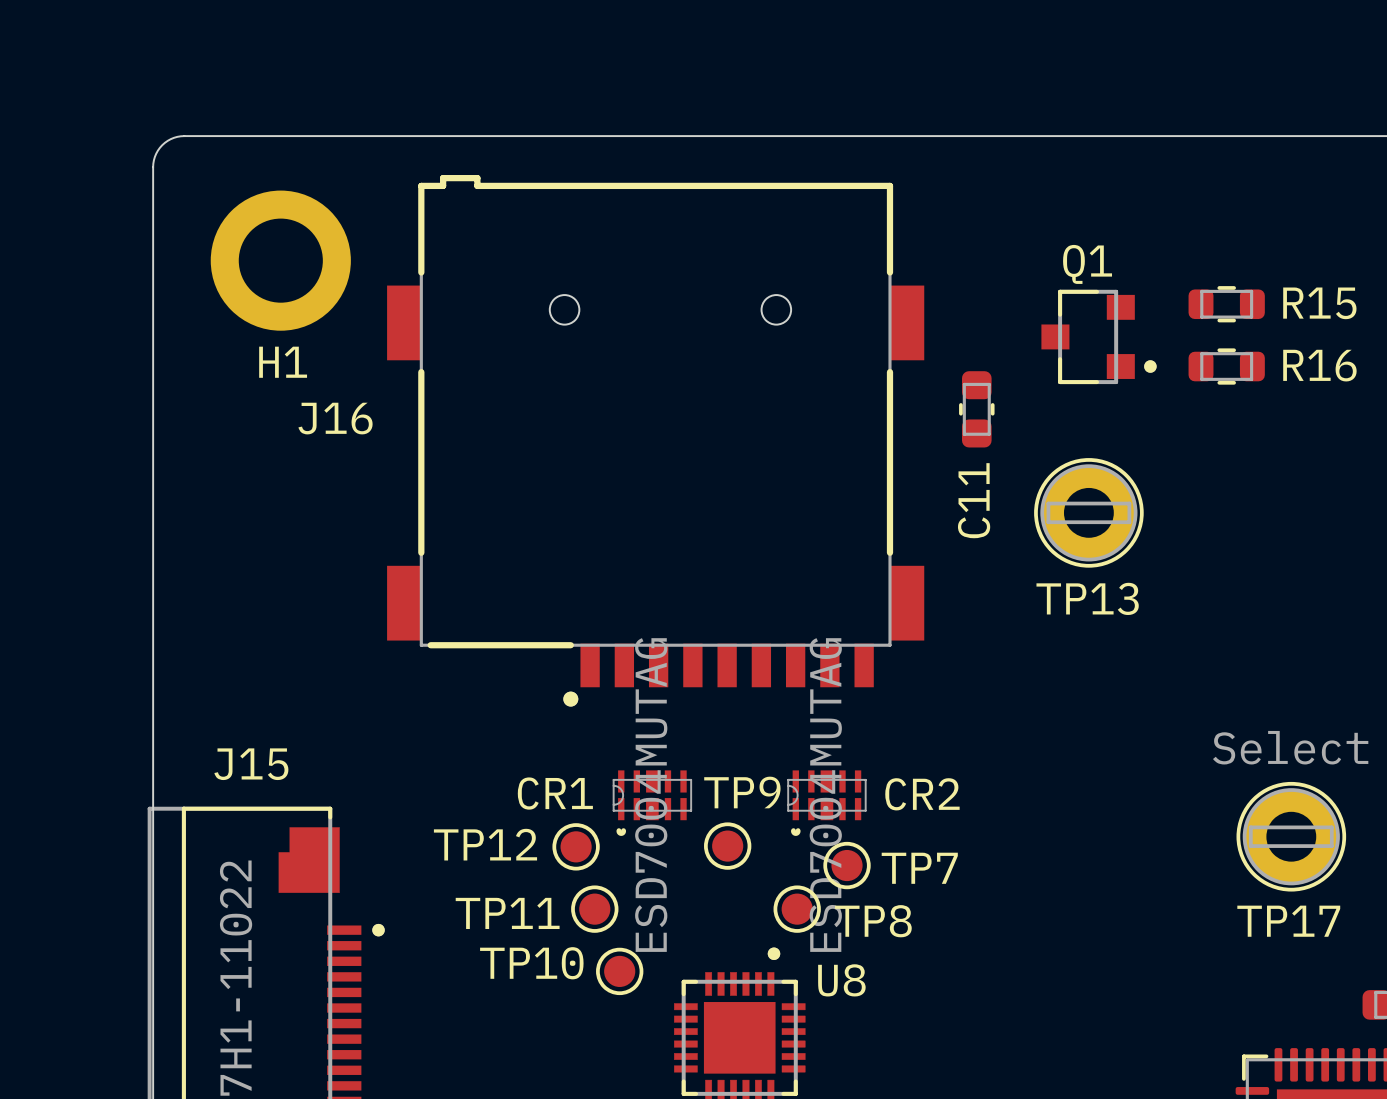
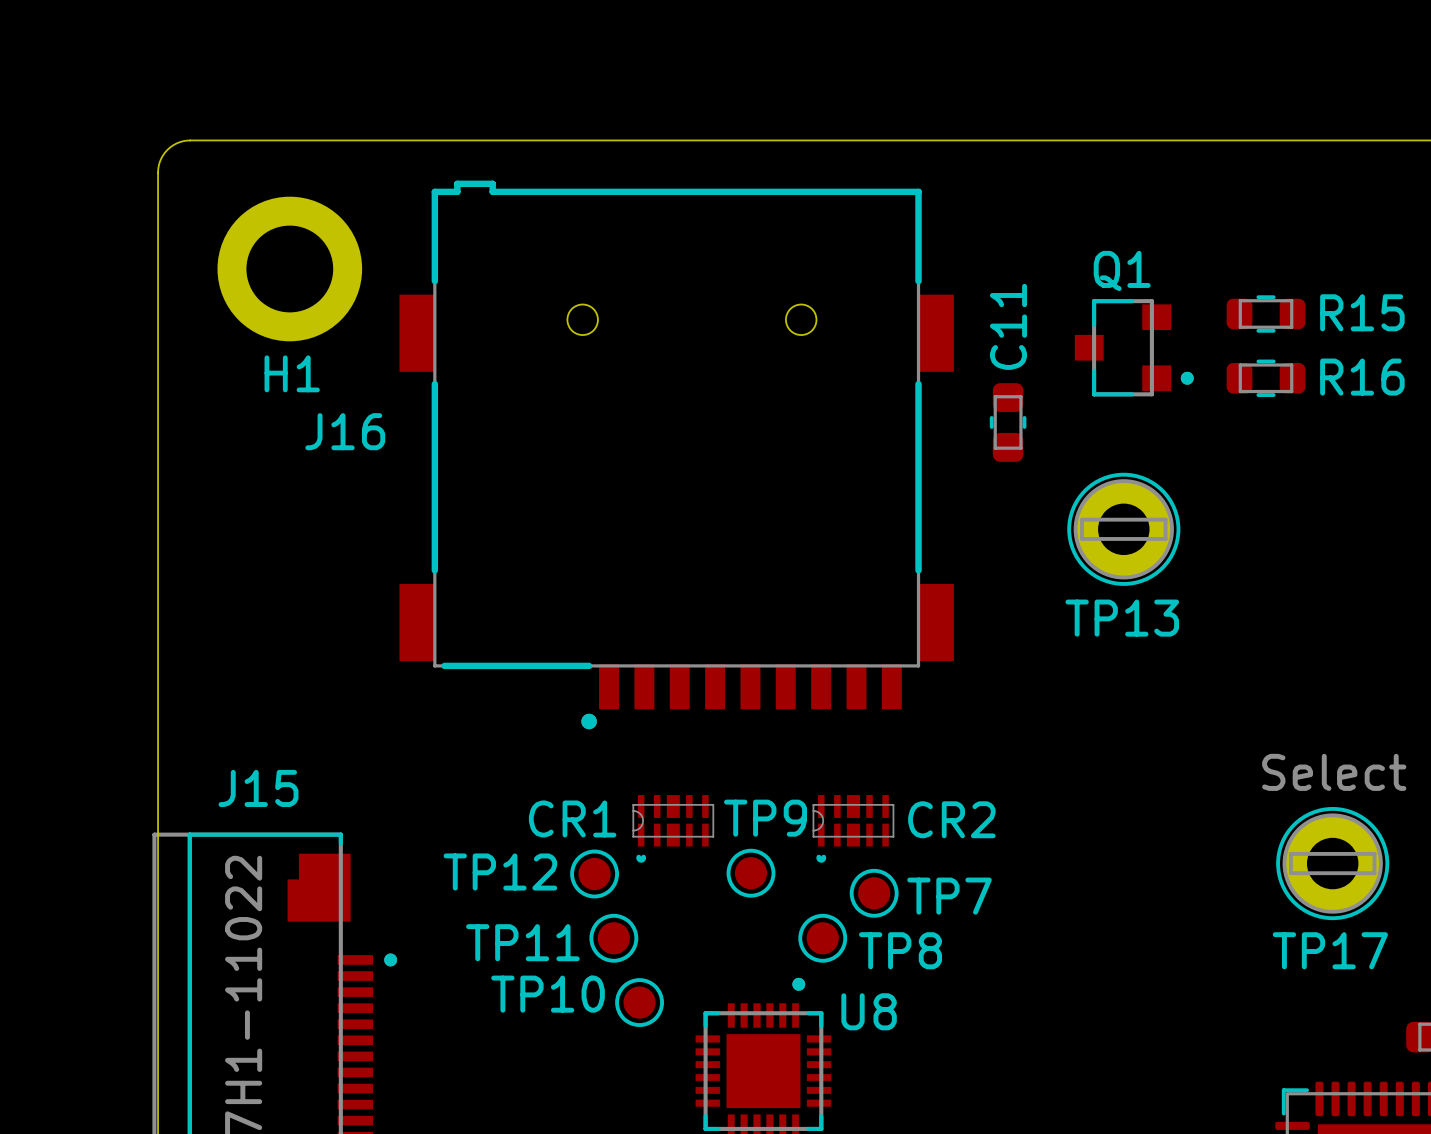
C11 name position: C11 (974, 500) -> C11 (1008, 326)
CR1 value: ESD7004MUTAG (651, 795) -> none
CR2 value: ESD7004MUTAG (825, 795) -> none

